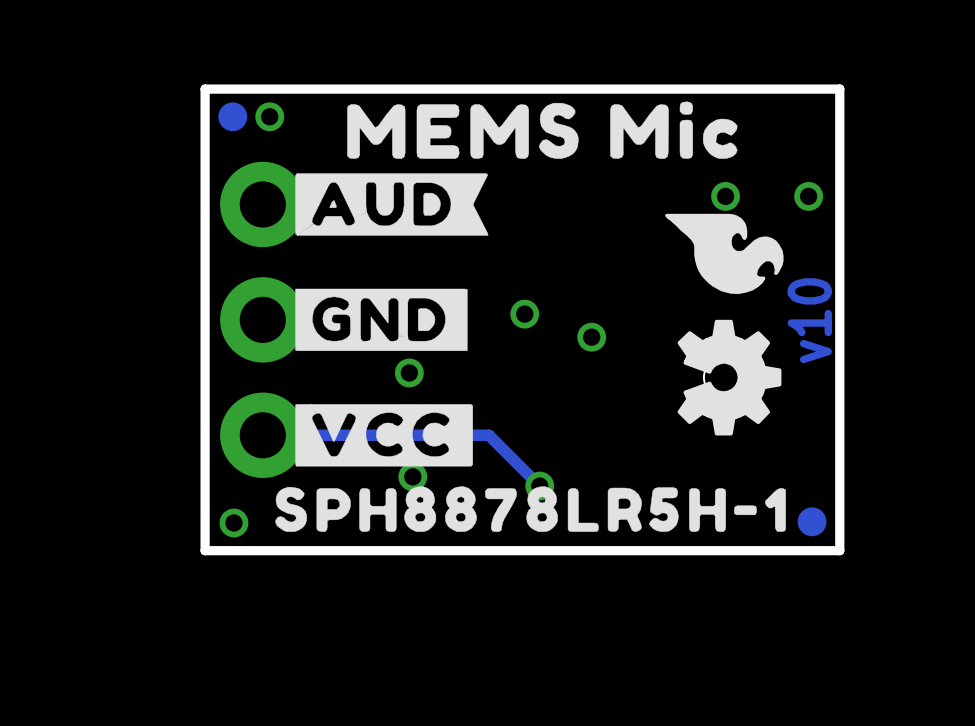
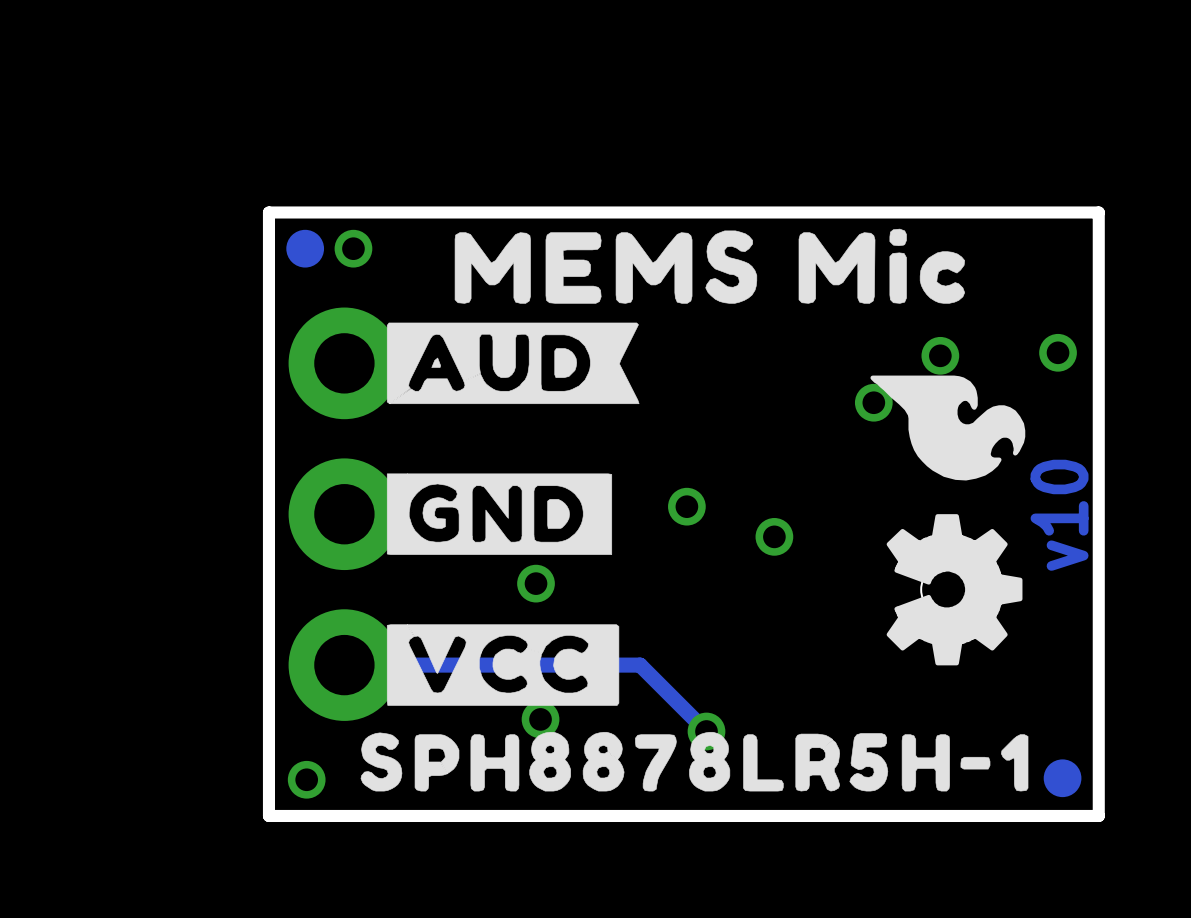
via position: (725, 196) -> (873, 402)
part: none -> (940, 355)

